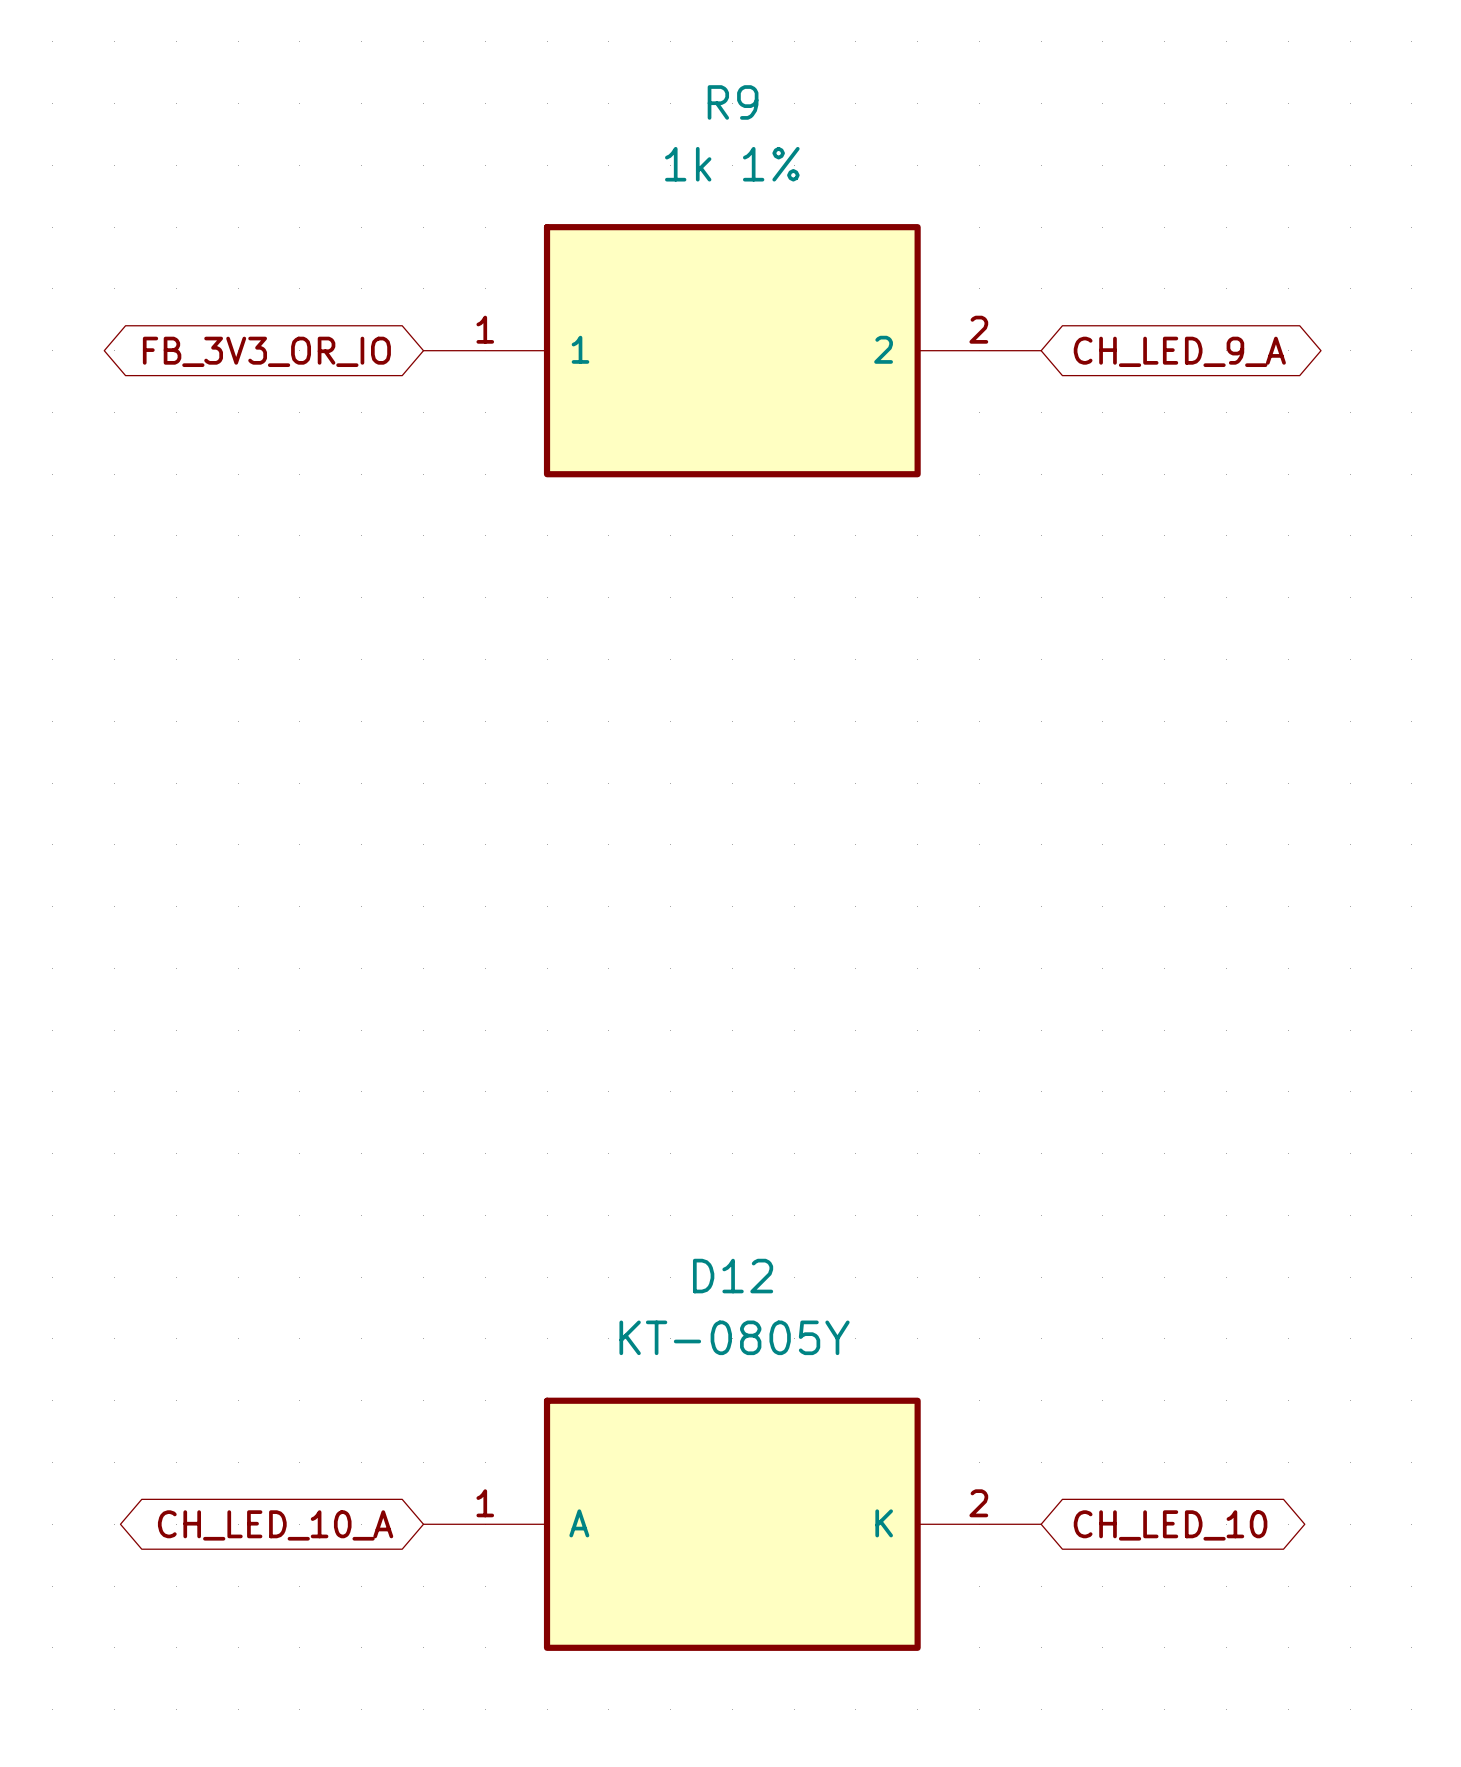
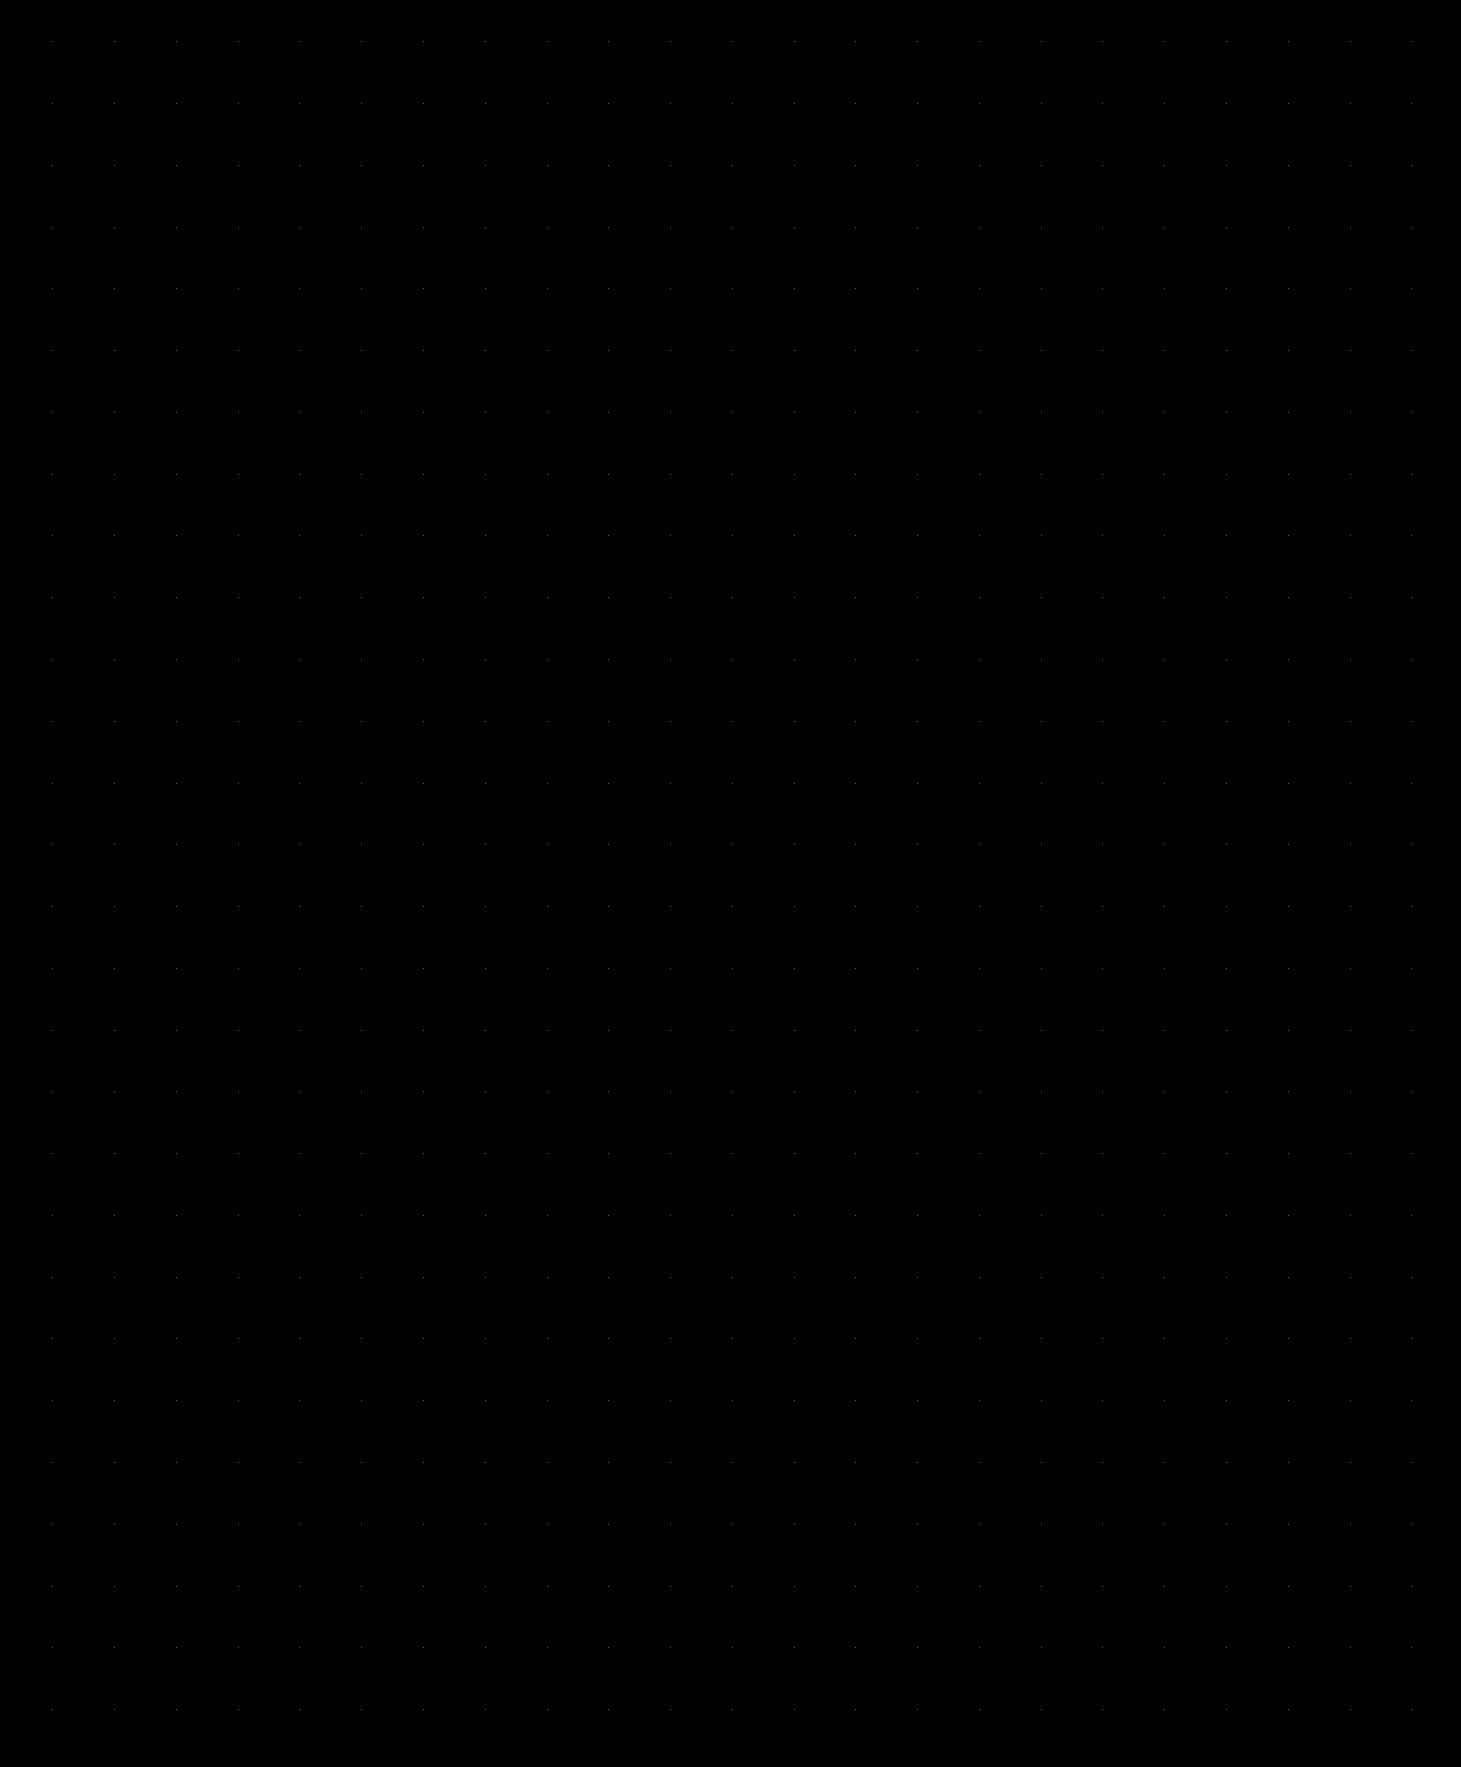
R9: 1k 1% (732, 350) -> none
global label: FB_3V3_OR_IO (266, 351) -> none
global label: CH_LED_9_A (1179, 351) -> none
D12: KT-0805Y (732, 1524) -> none
global label: CH_LED_10_A (275, 1525) -> none
global label: CH_LED_10 (1170, 1525) -> none

